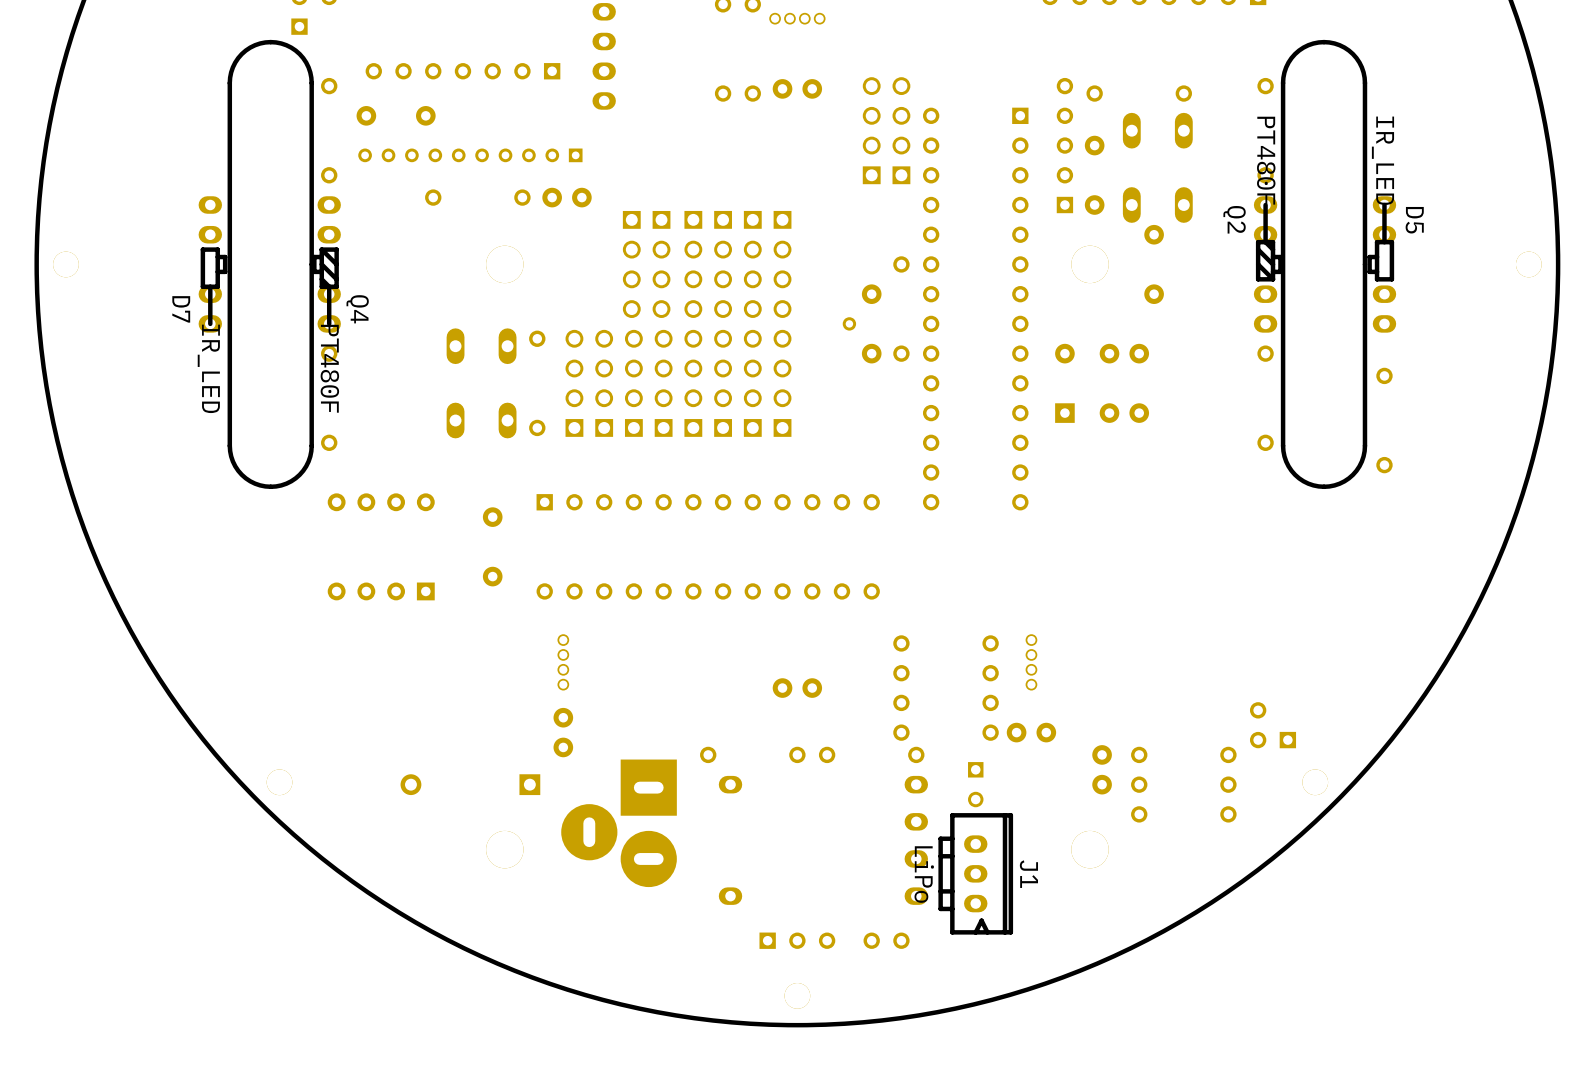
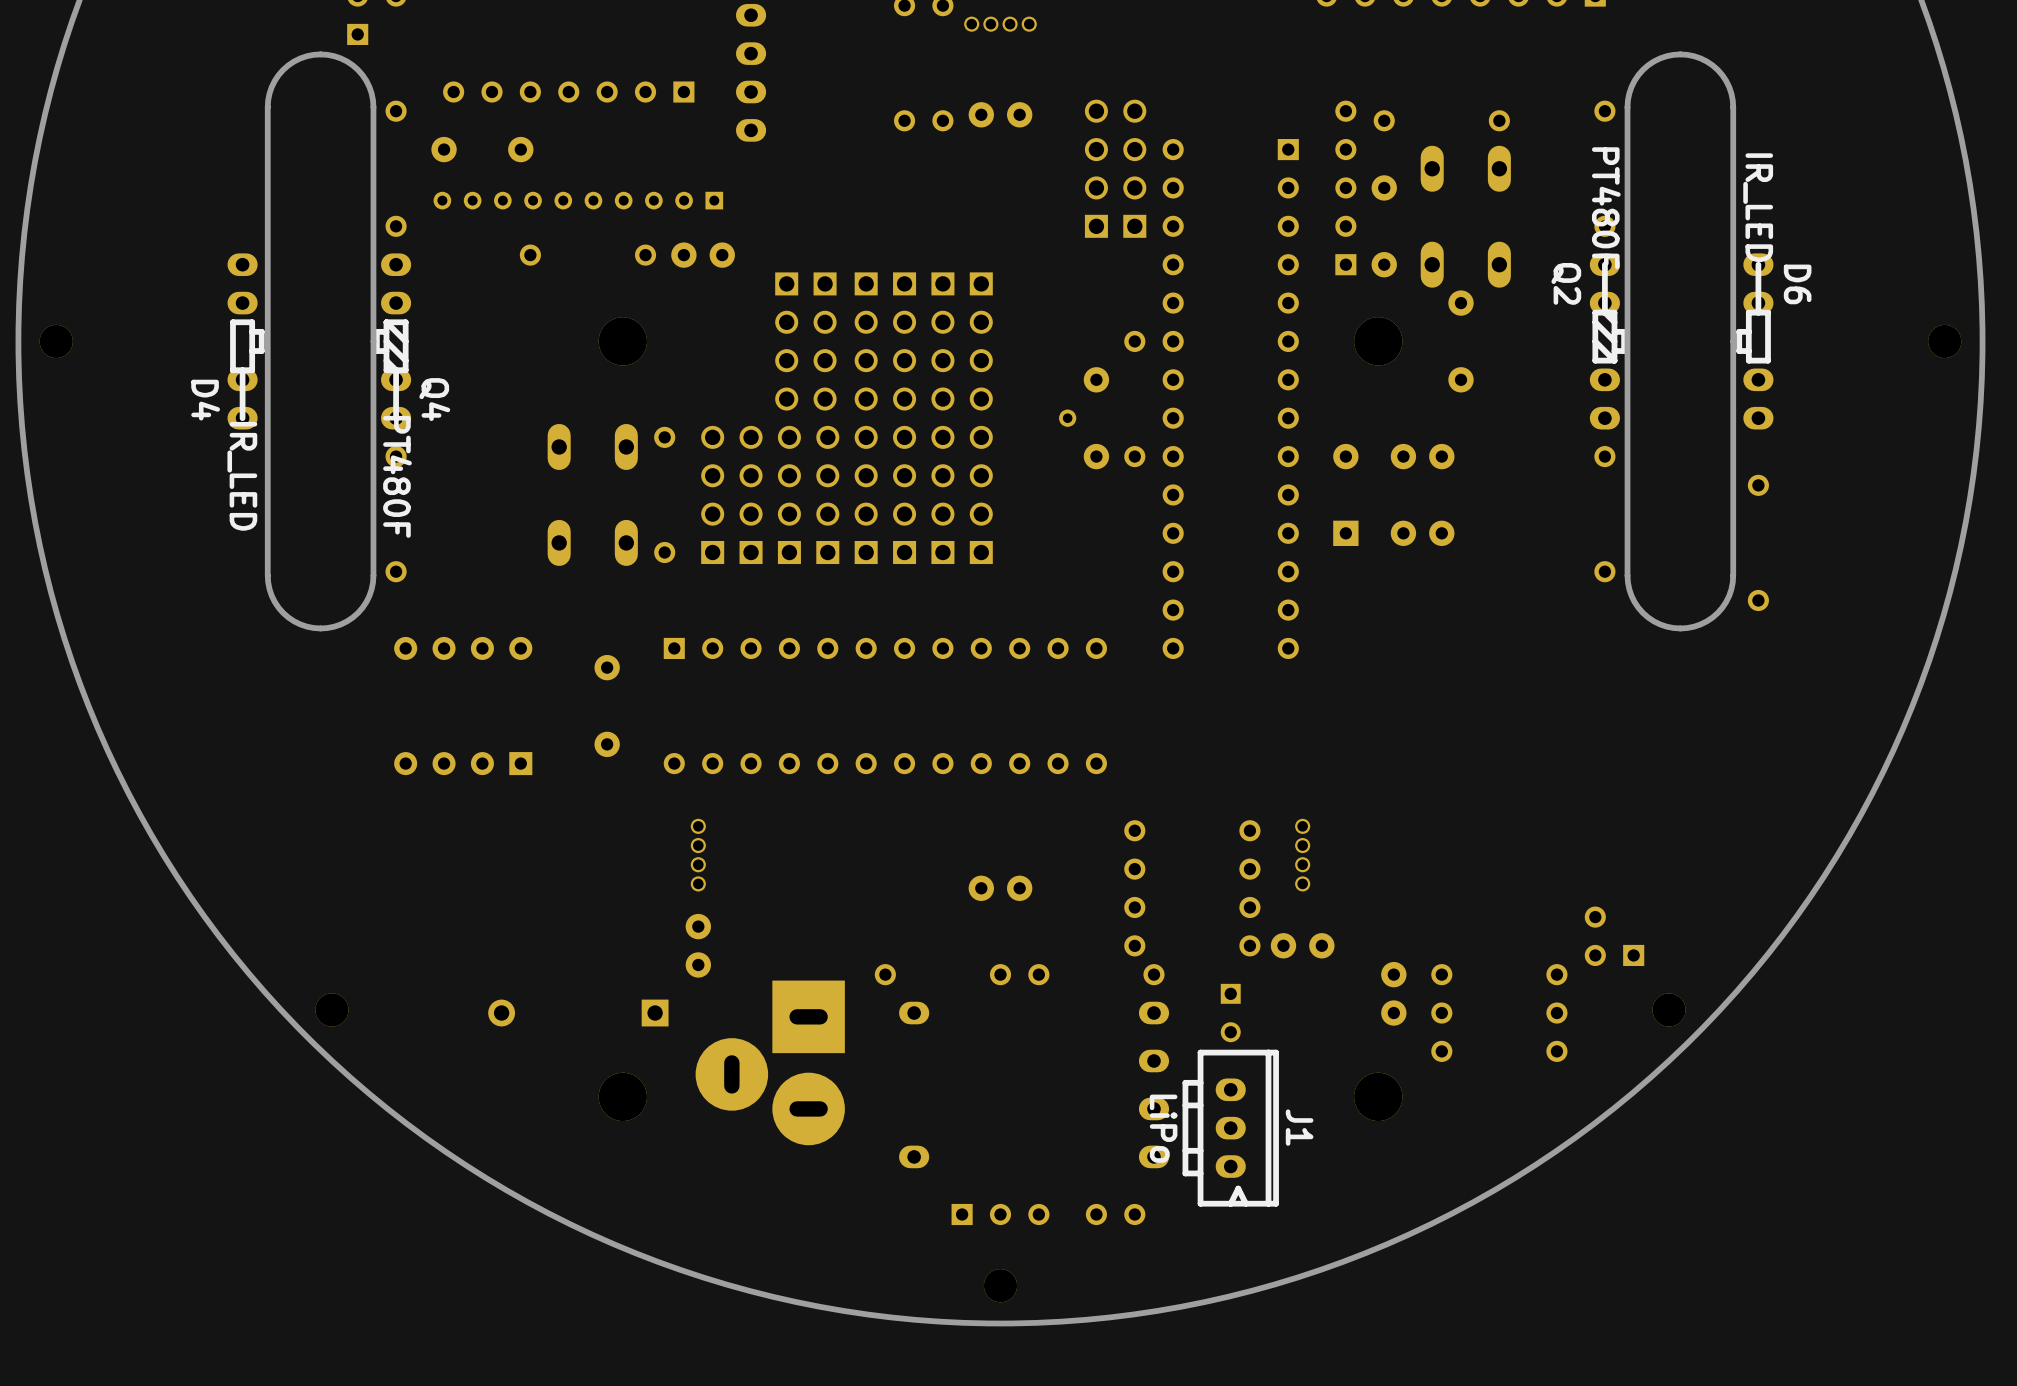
D5 name: D5 (1414, 220) -> D6 (1797, 284)
D7 name: D7 (181, 309) -> D4 (205, 400)

